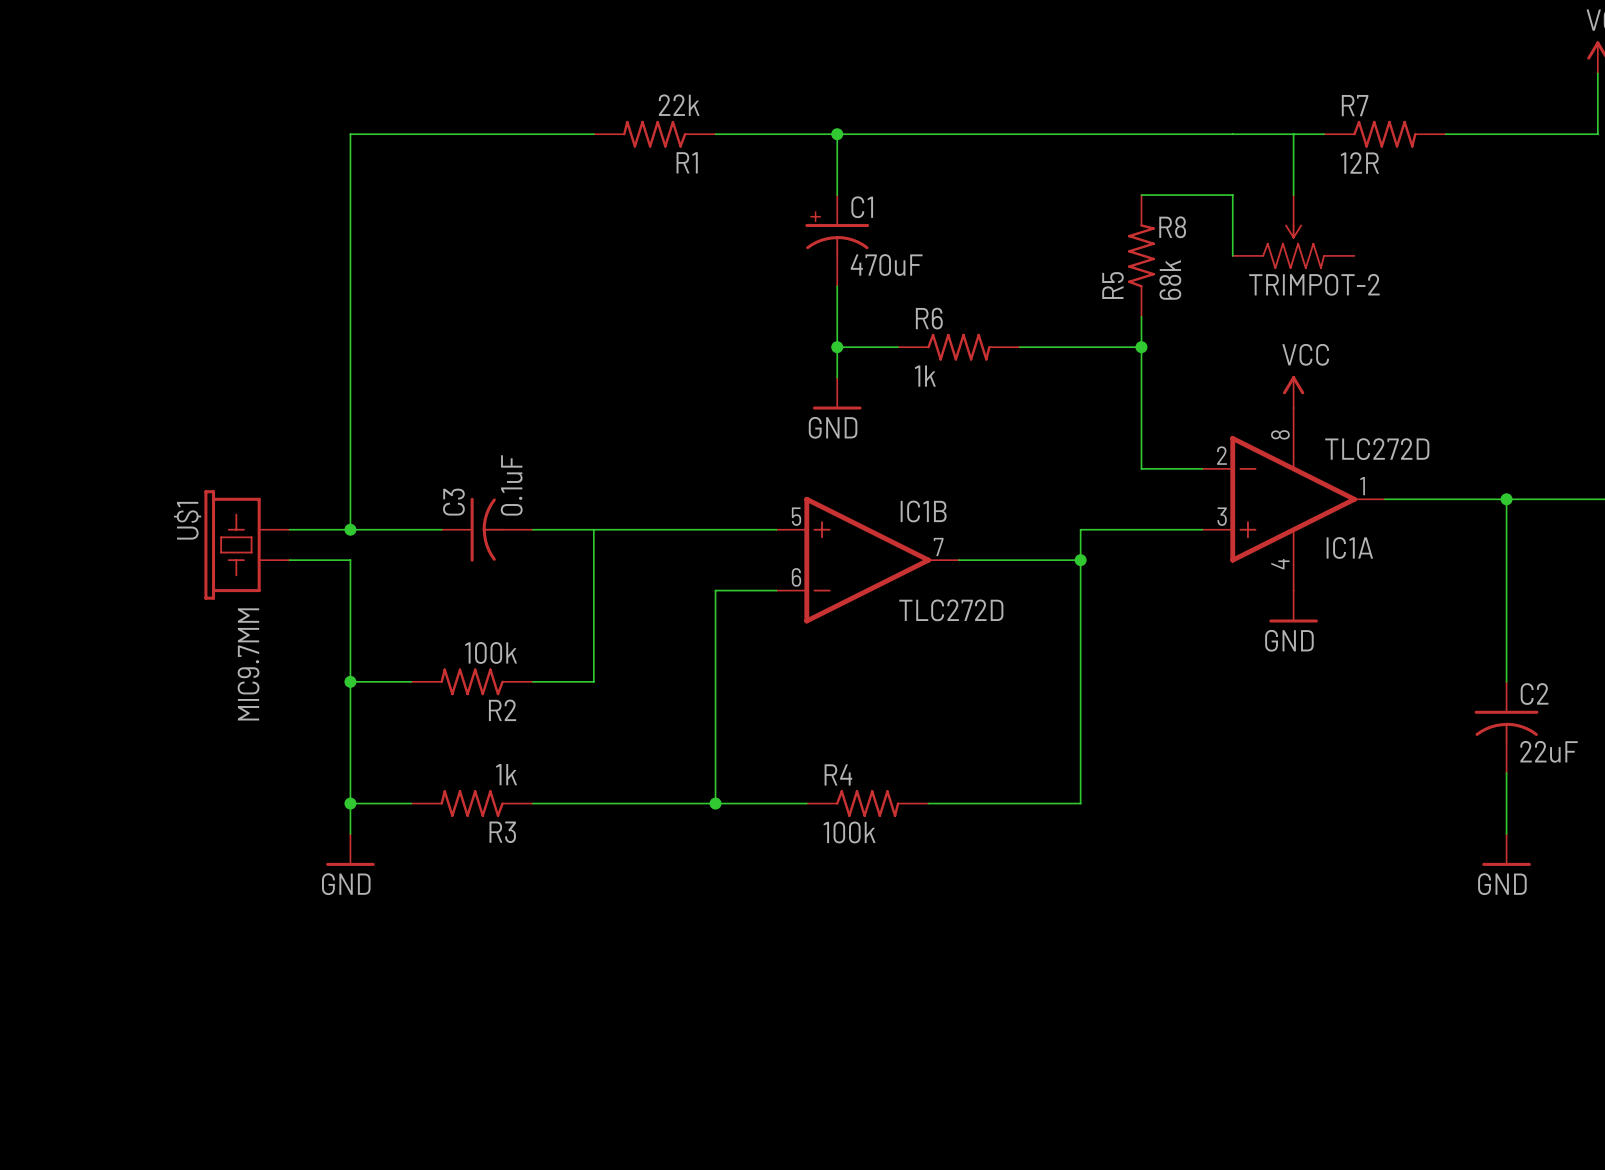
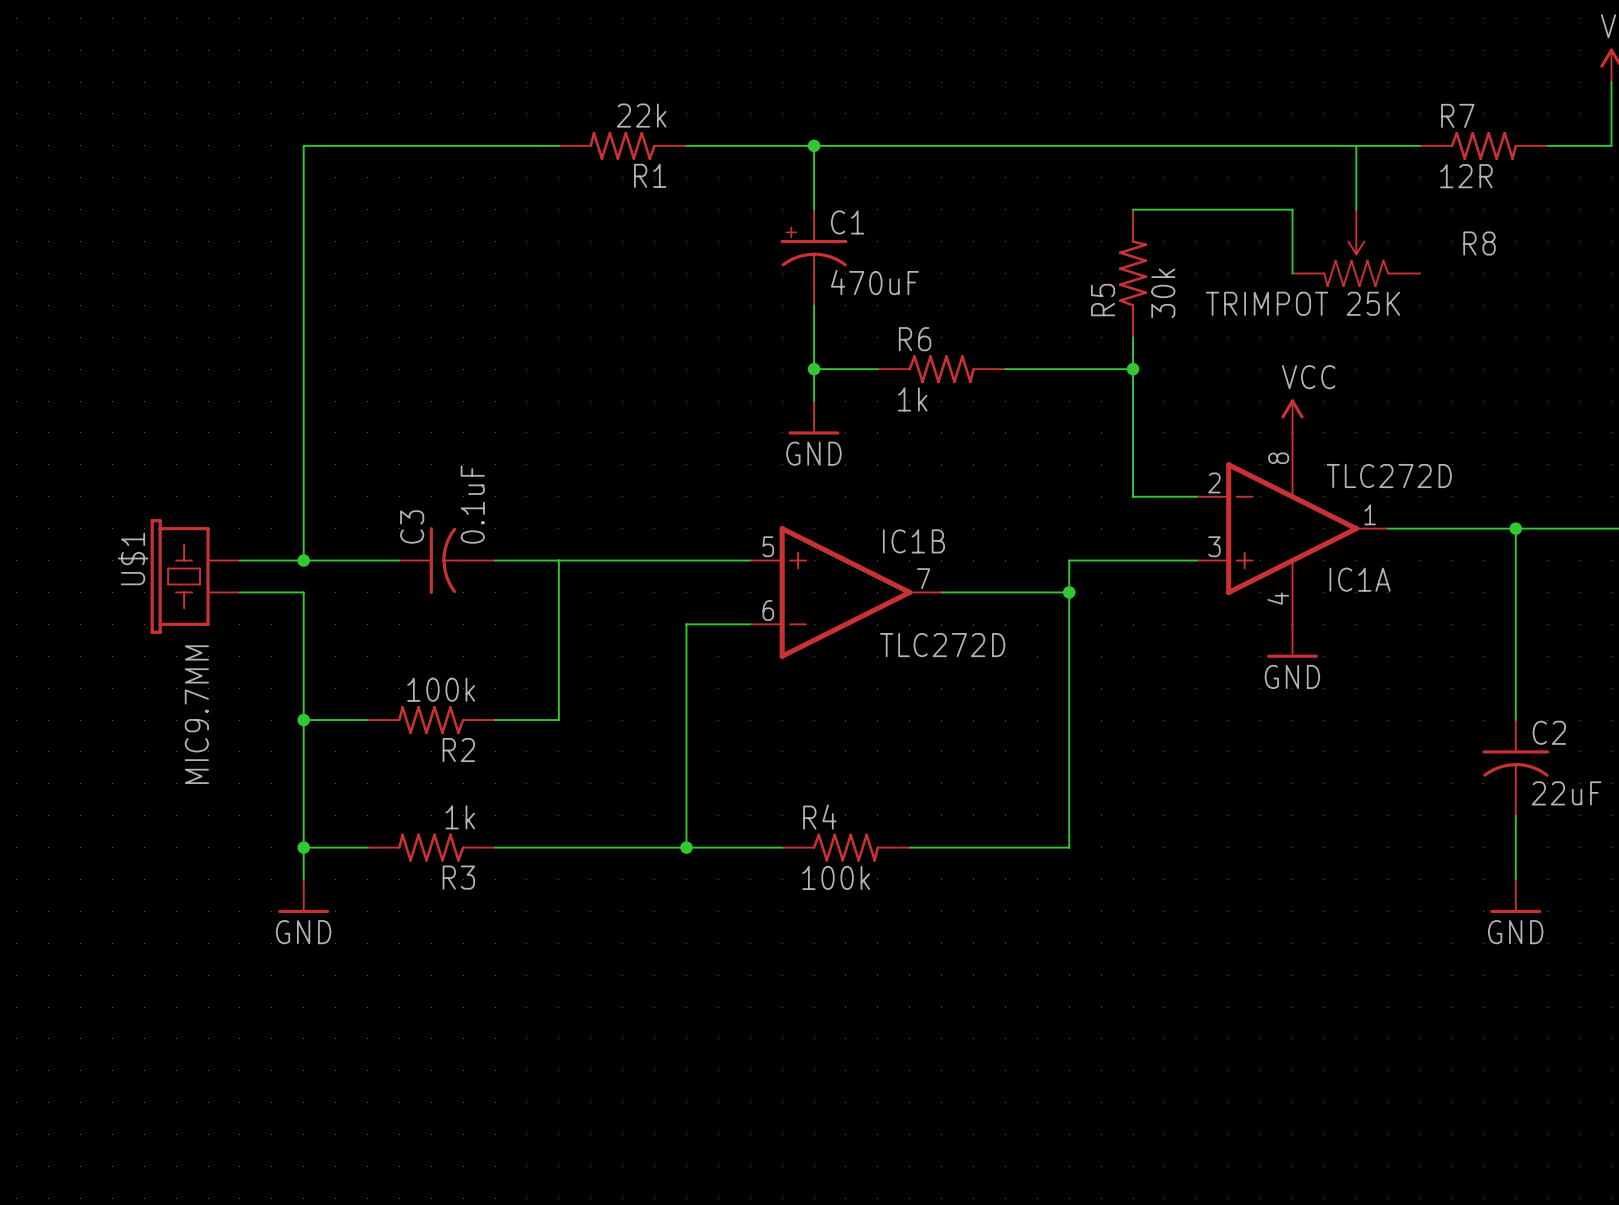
wire: (1293, 134) (1293, 195) -> (1356, 145) (1356, 209)
R7 position: (1384, 134) -> (1483, 145)
wire: (1232, 195) (1232, 255) -> (1228, 209) (1292, 209) (1292, 273)
R8 flip: as is (1293, 246) -> left-right (1356, 263)
R5 value: 68k (1170, 280) -> 30k (1163, 293)
R8 value: TRIMPOT-2 (1314, 284) -> TRIMPOT 25K (1302, 303)

